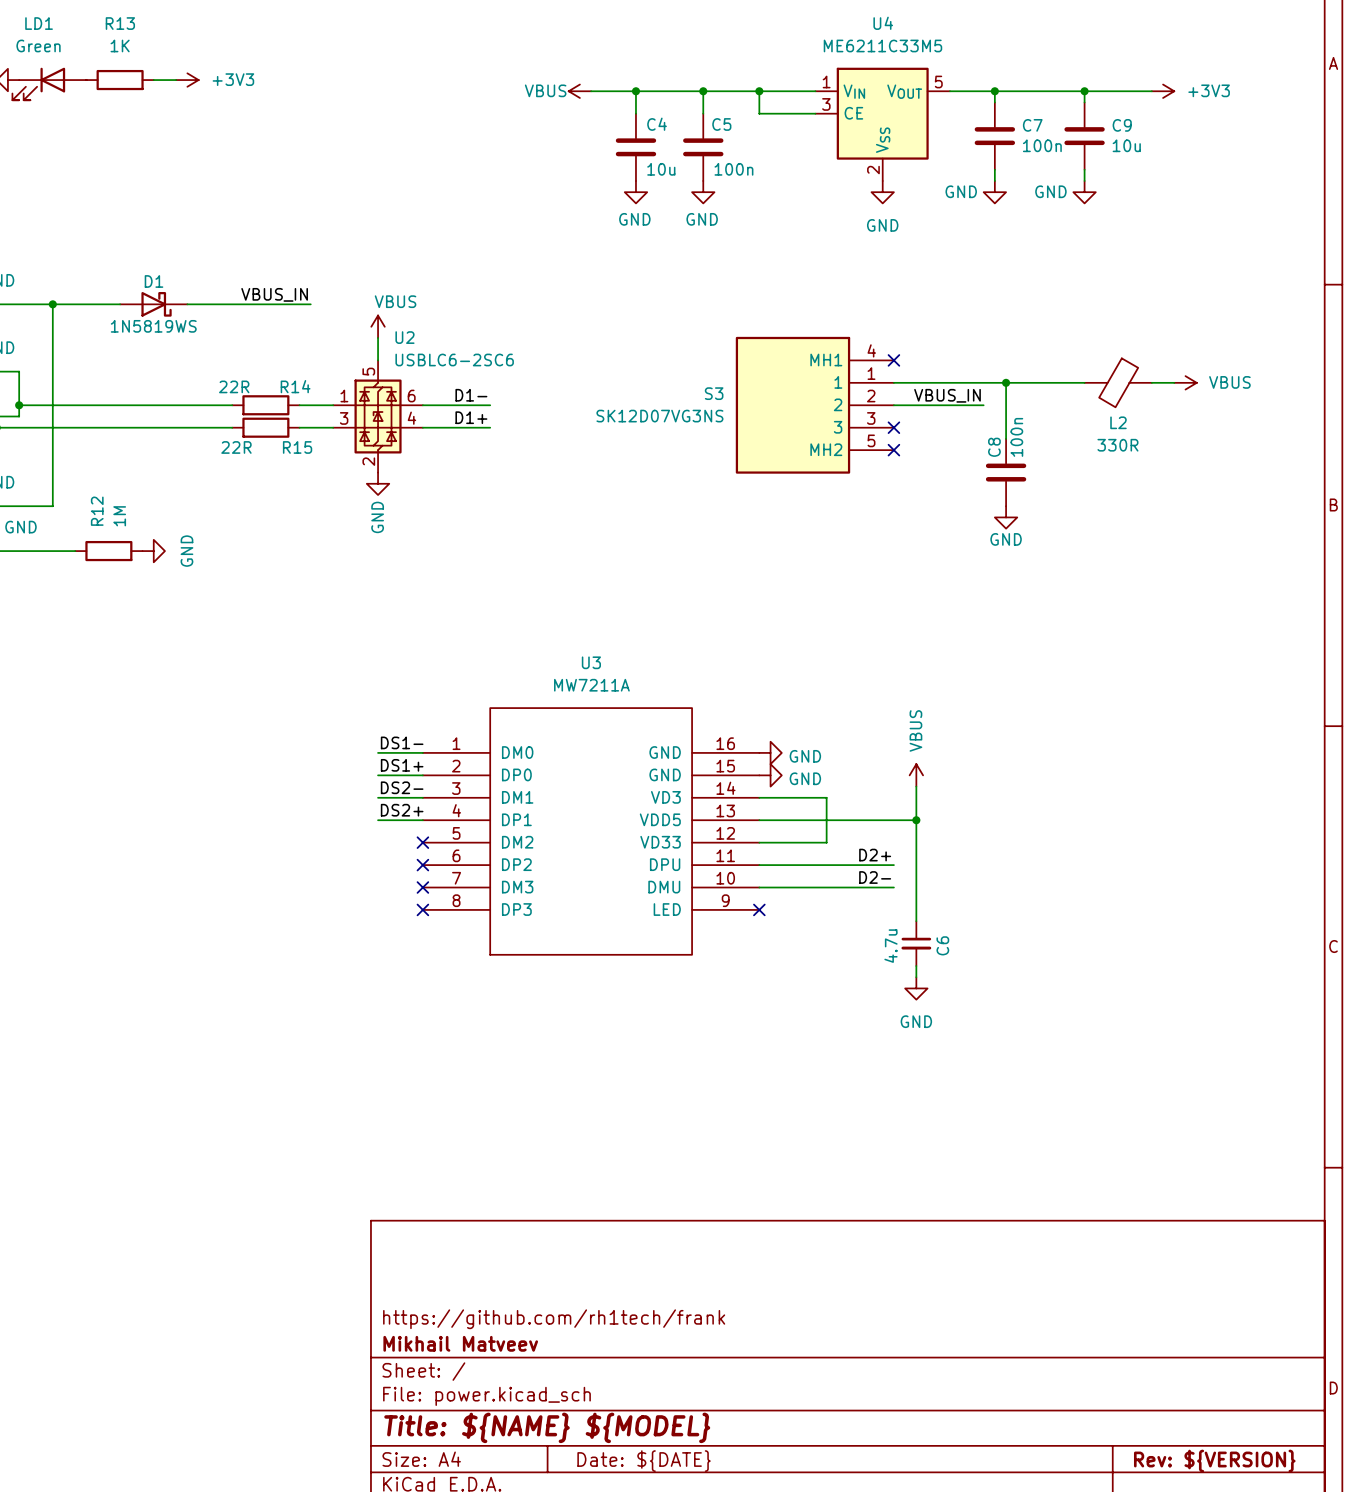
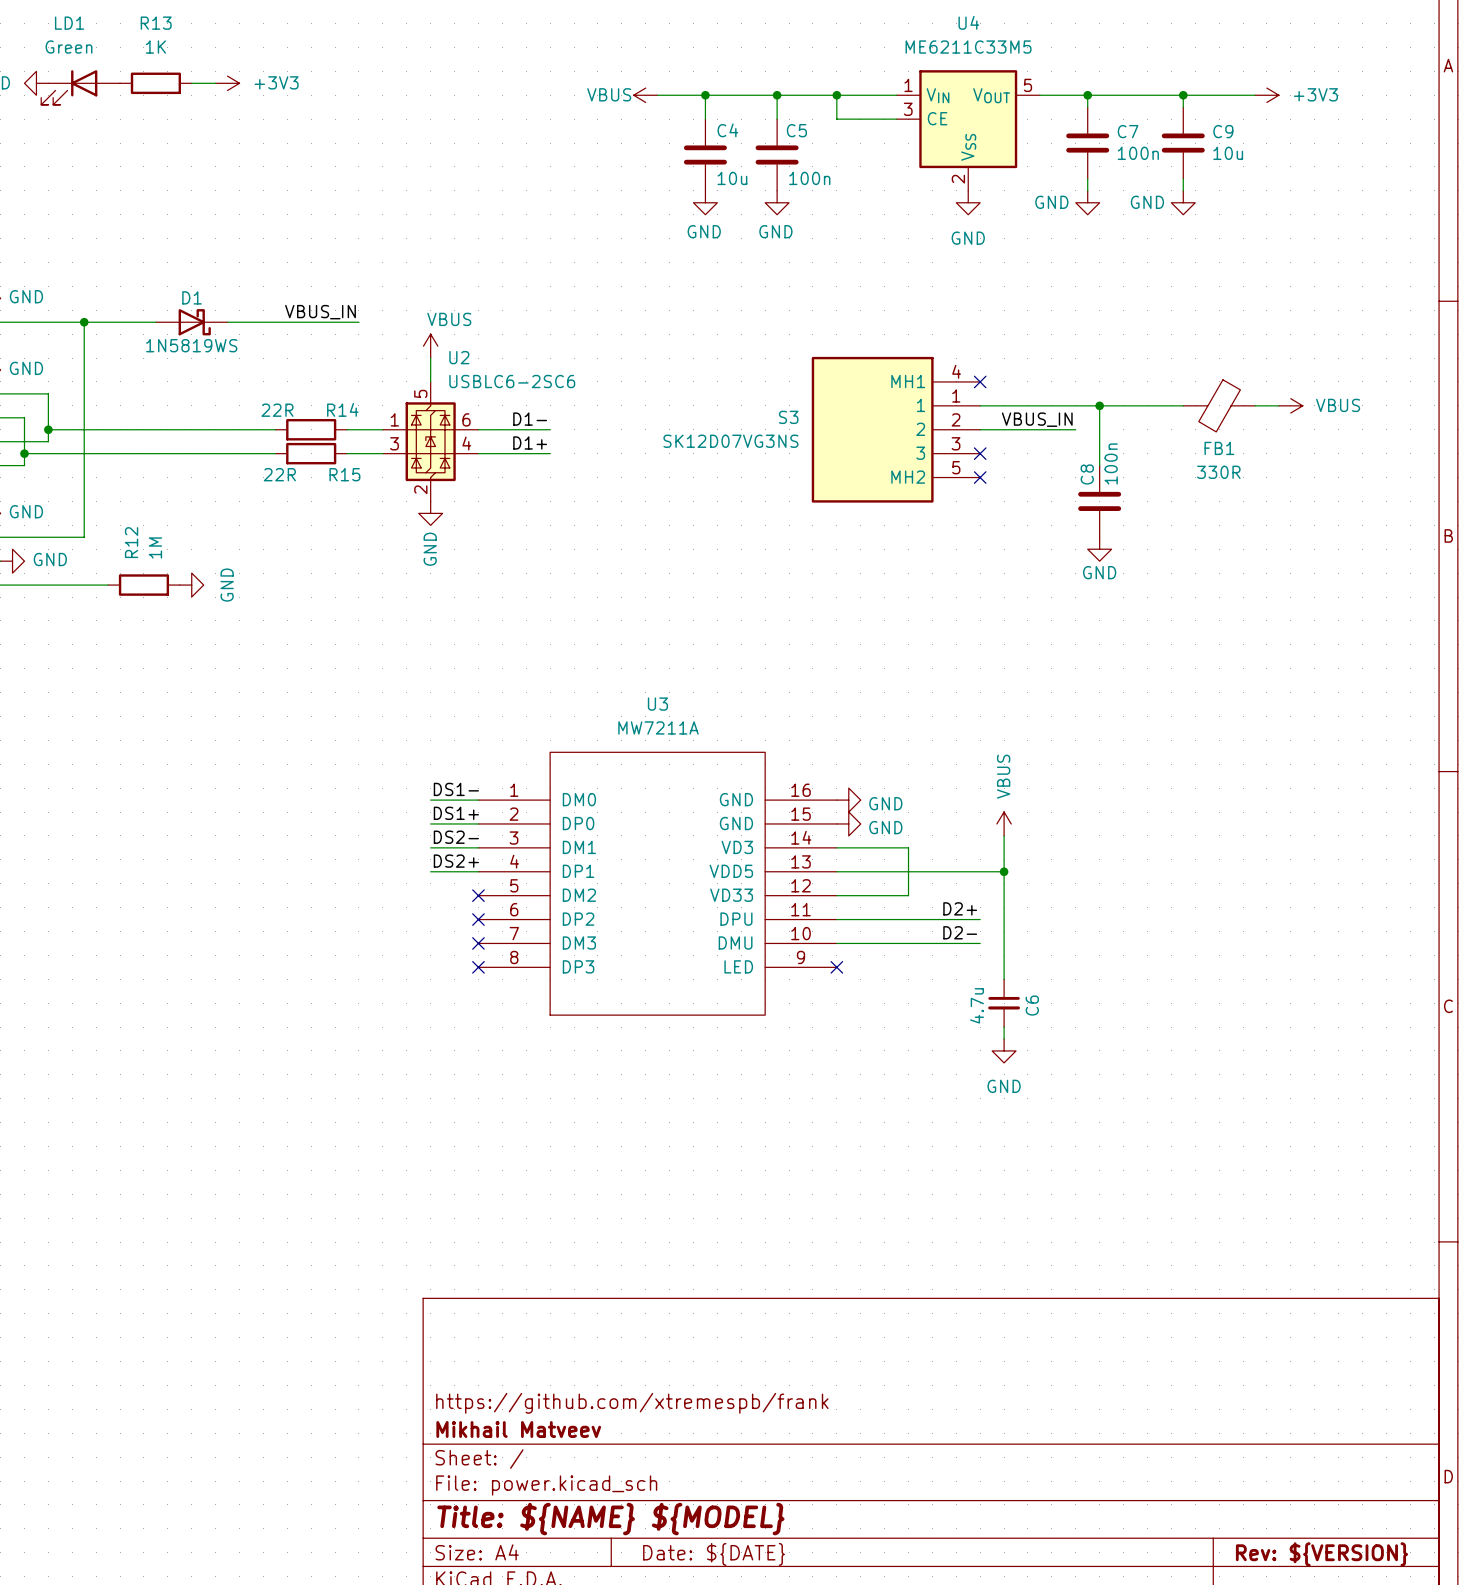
L2 name: L2 (1118, 422) -> FB1 (1219, 448)
title block: https://github.com/rh1tech/frank (554, 1319) -> https://github.com/xtremespb/frank (632, 1403)

